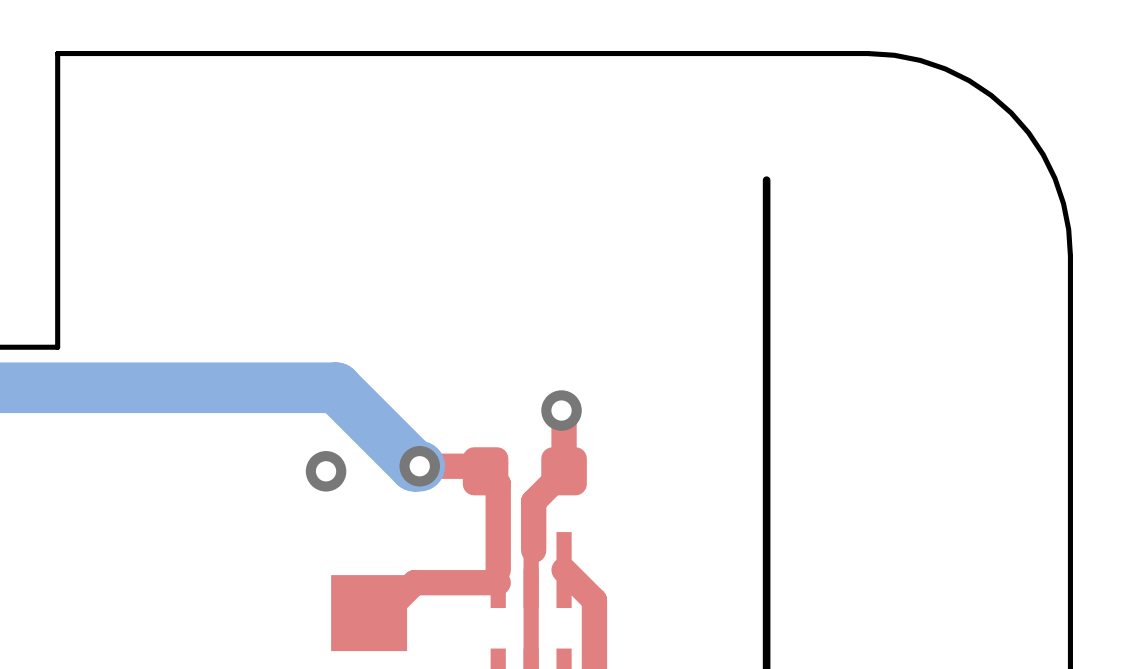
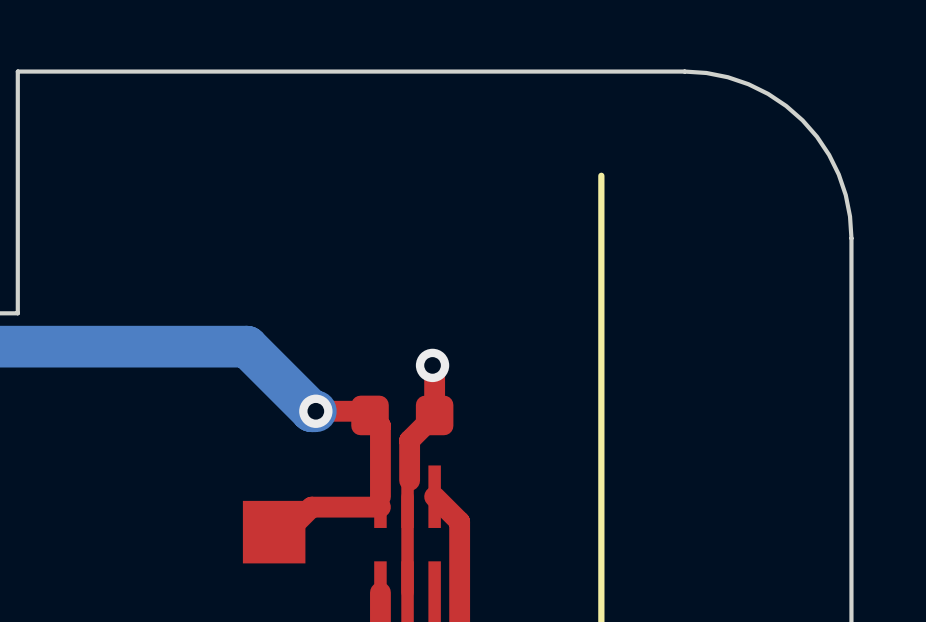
via: (326, 471) -> none

